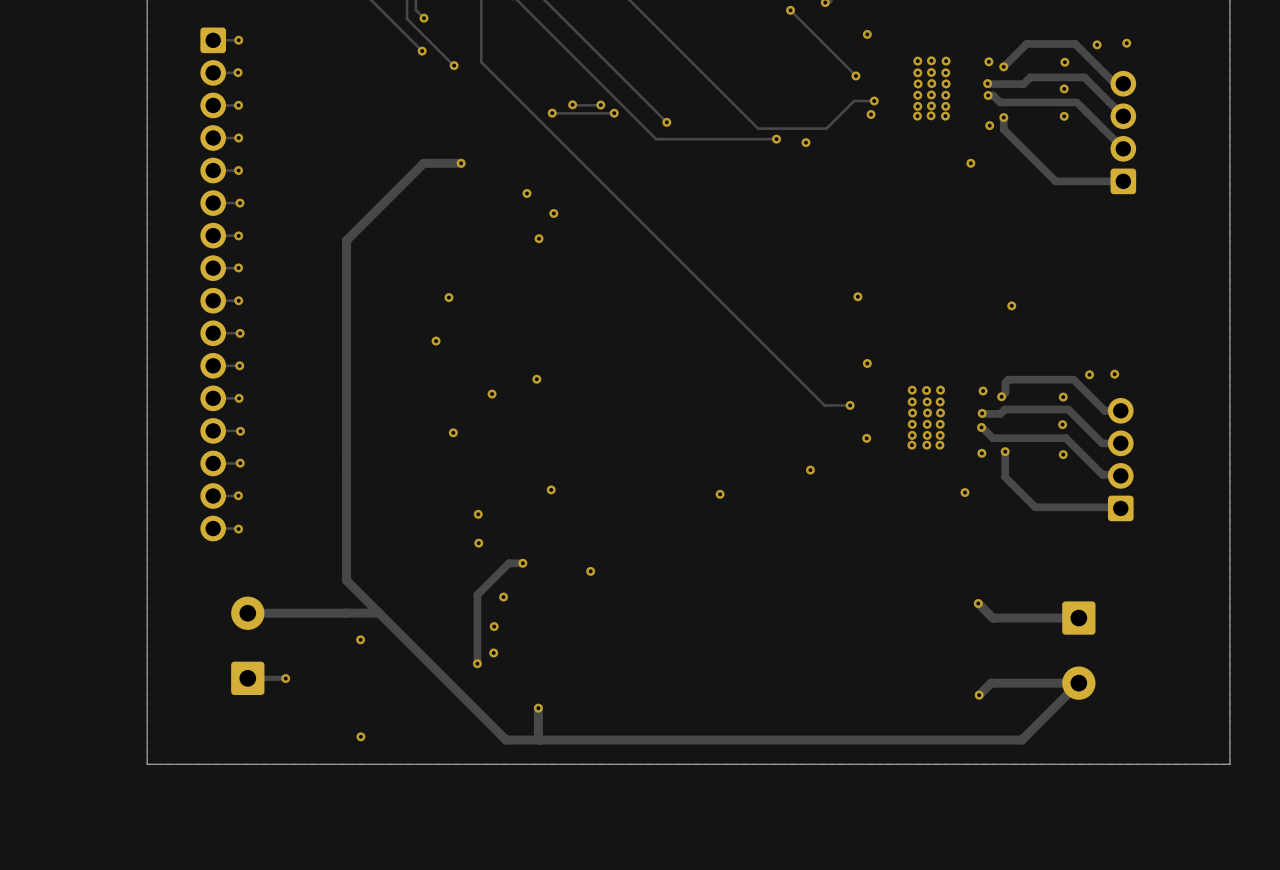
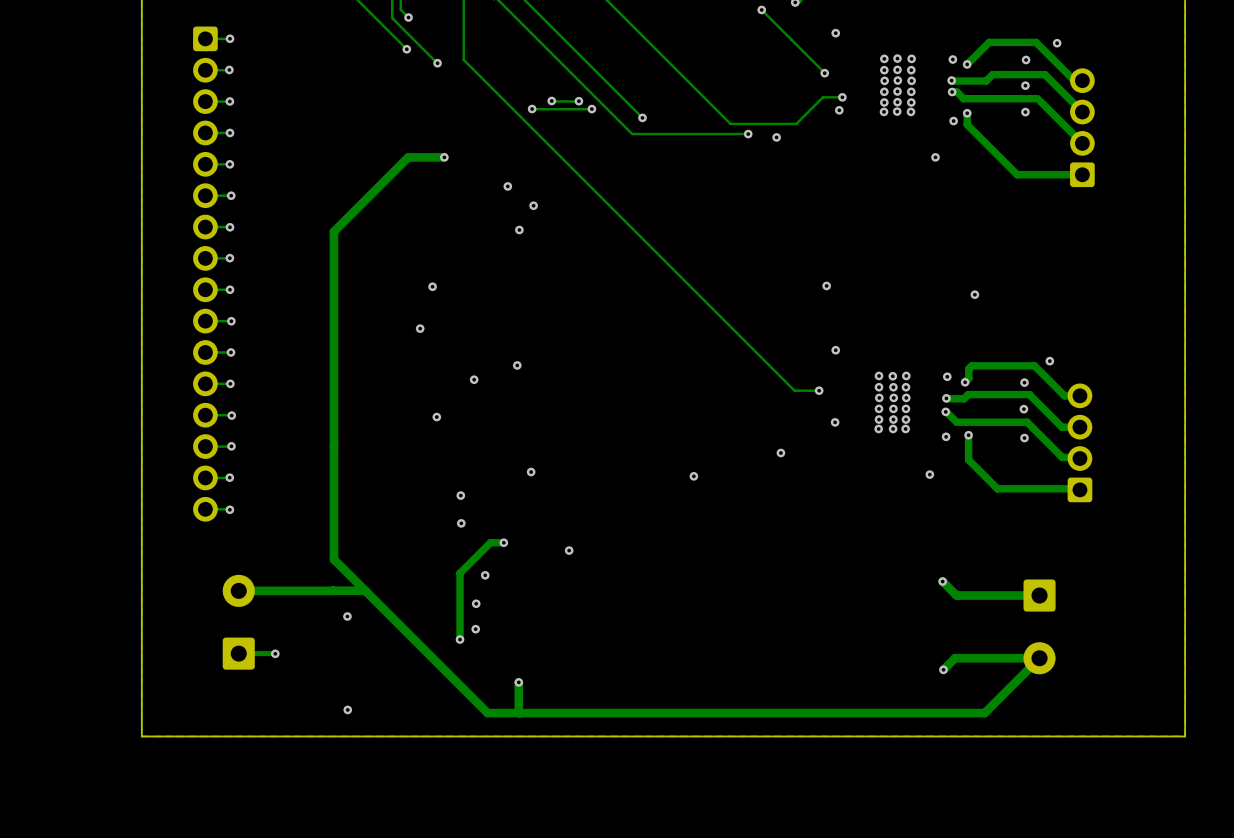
via: (1126, 43) -> none
via: (1114, 374) -> none

